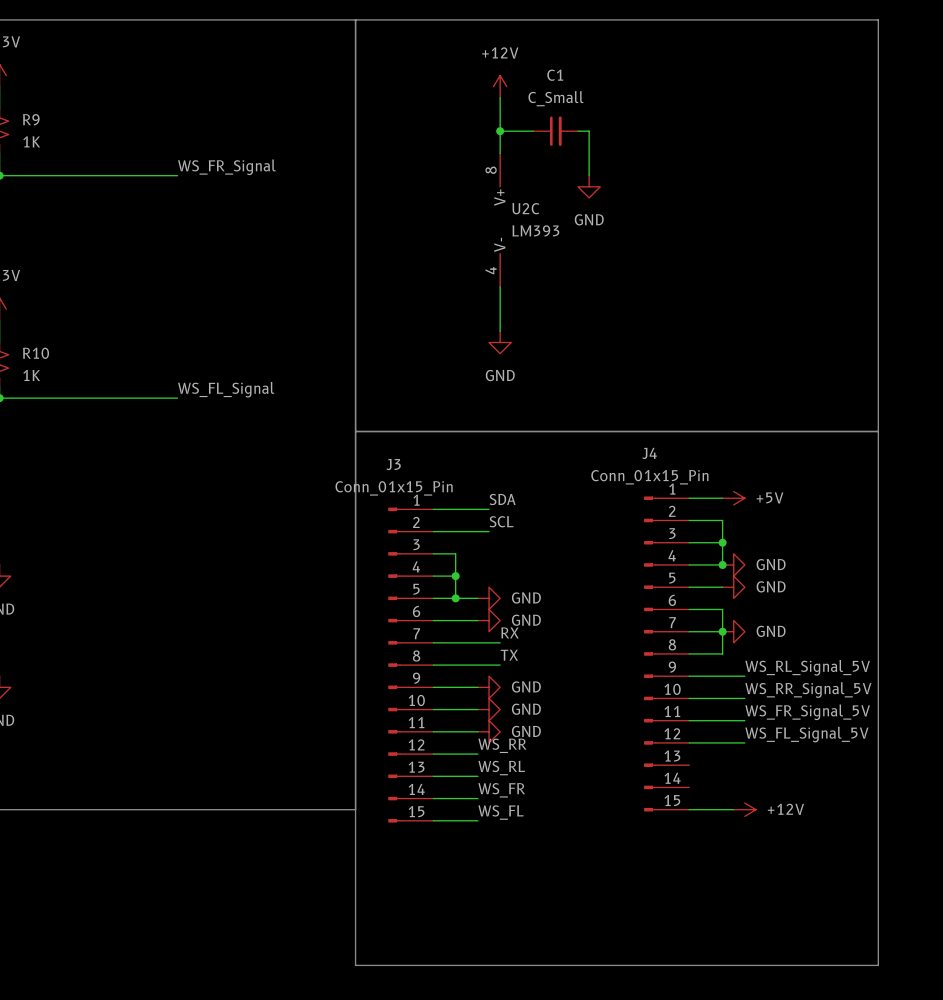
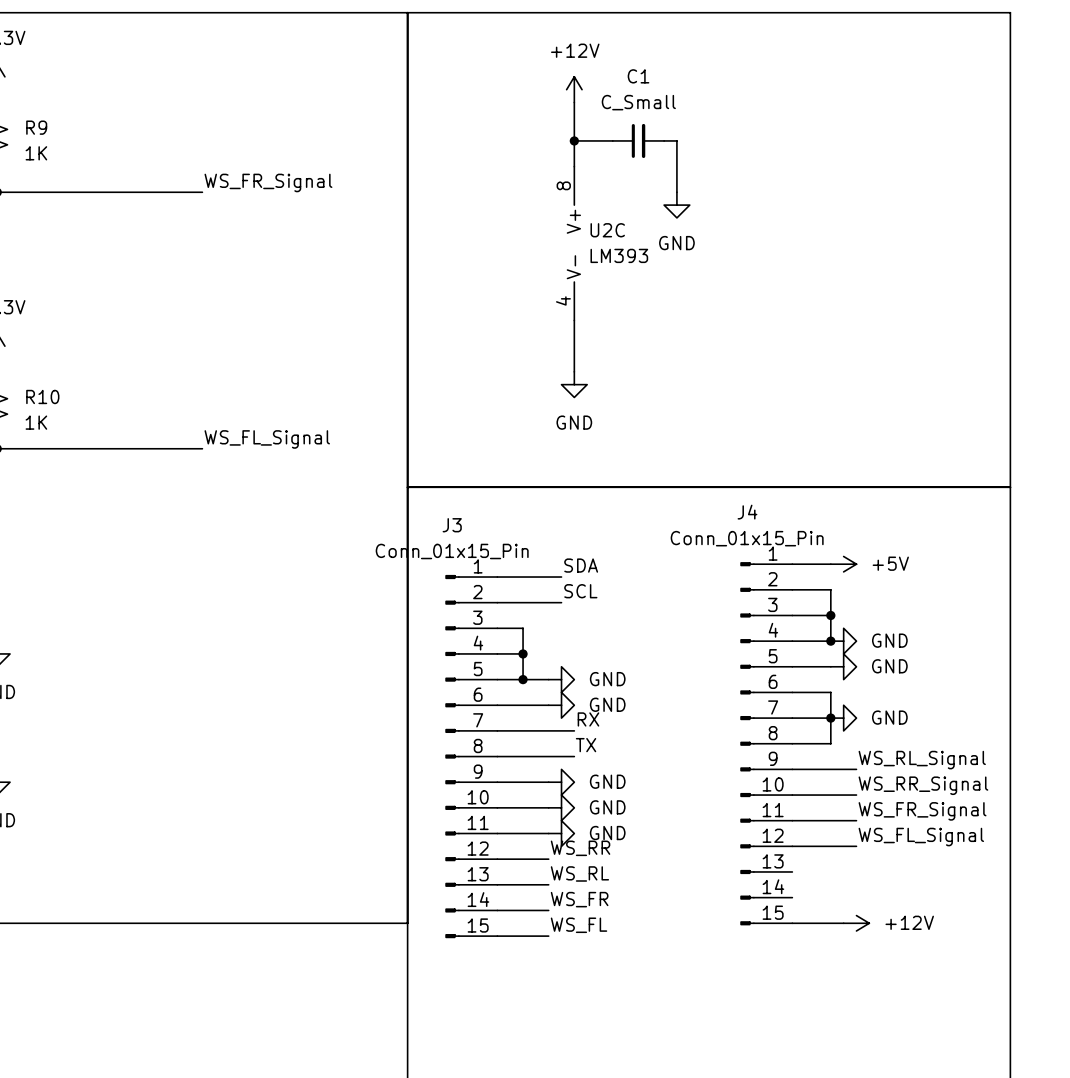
label: WS_RL_Signal_5V (807, 667) -> WS_RL_Signal (922, 760)
label: WS_RR_Signal_5V (808, 690) -> WS_RR_Signal (923, 785)
label: WS_FR_Signal_5V (807, 712) -> WS_FR_Signal (922, 811)
label: WS_FL_Signal_5V (806, 734) -> WS_FL_Signal (921, 837)

